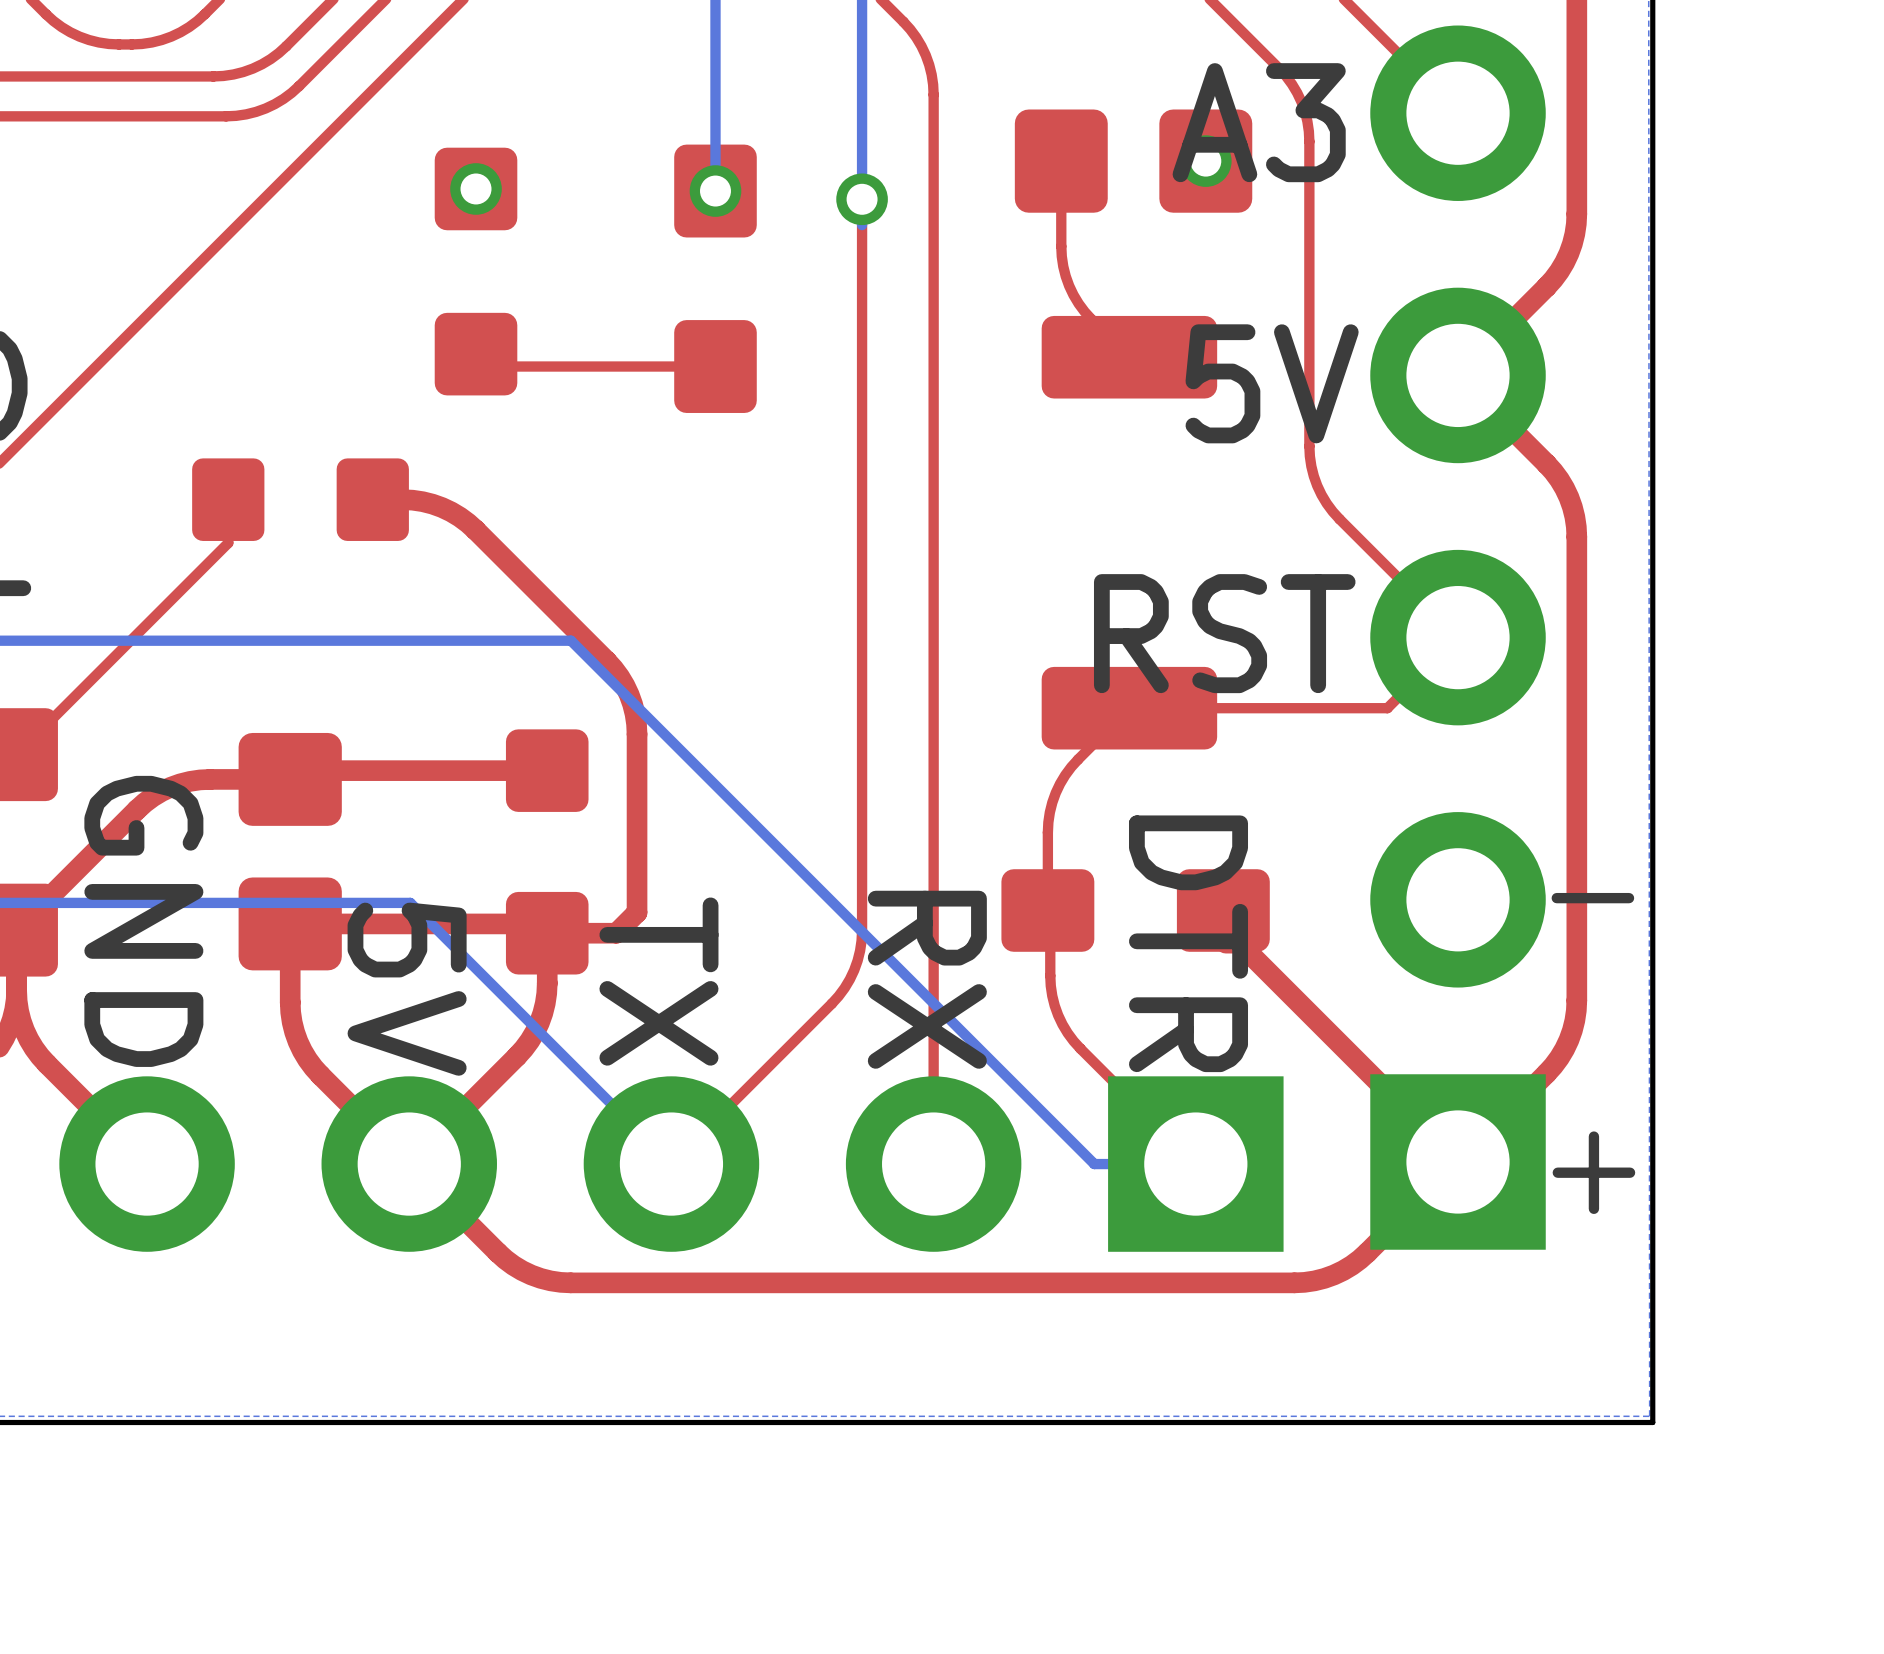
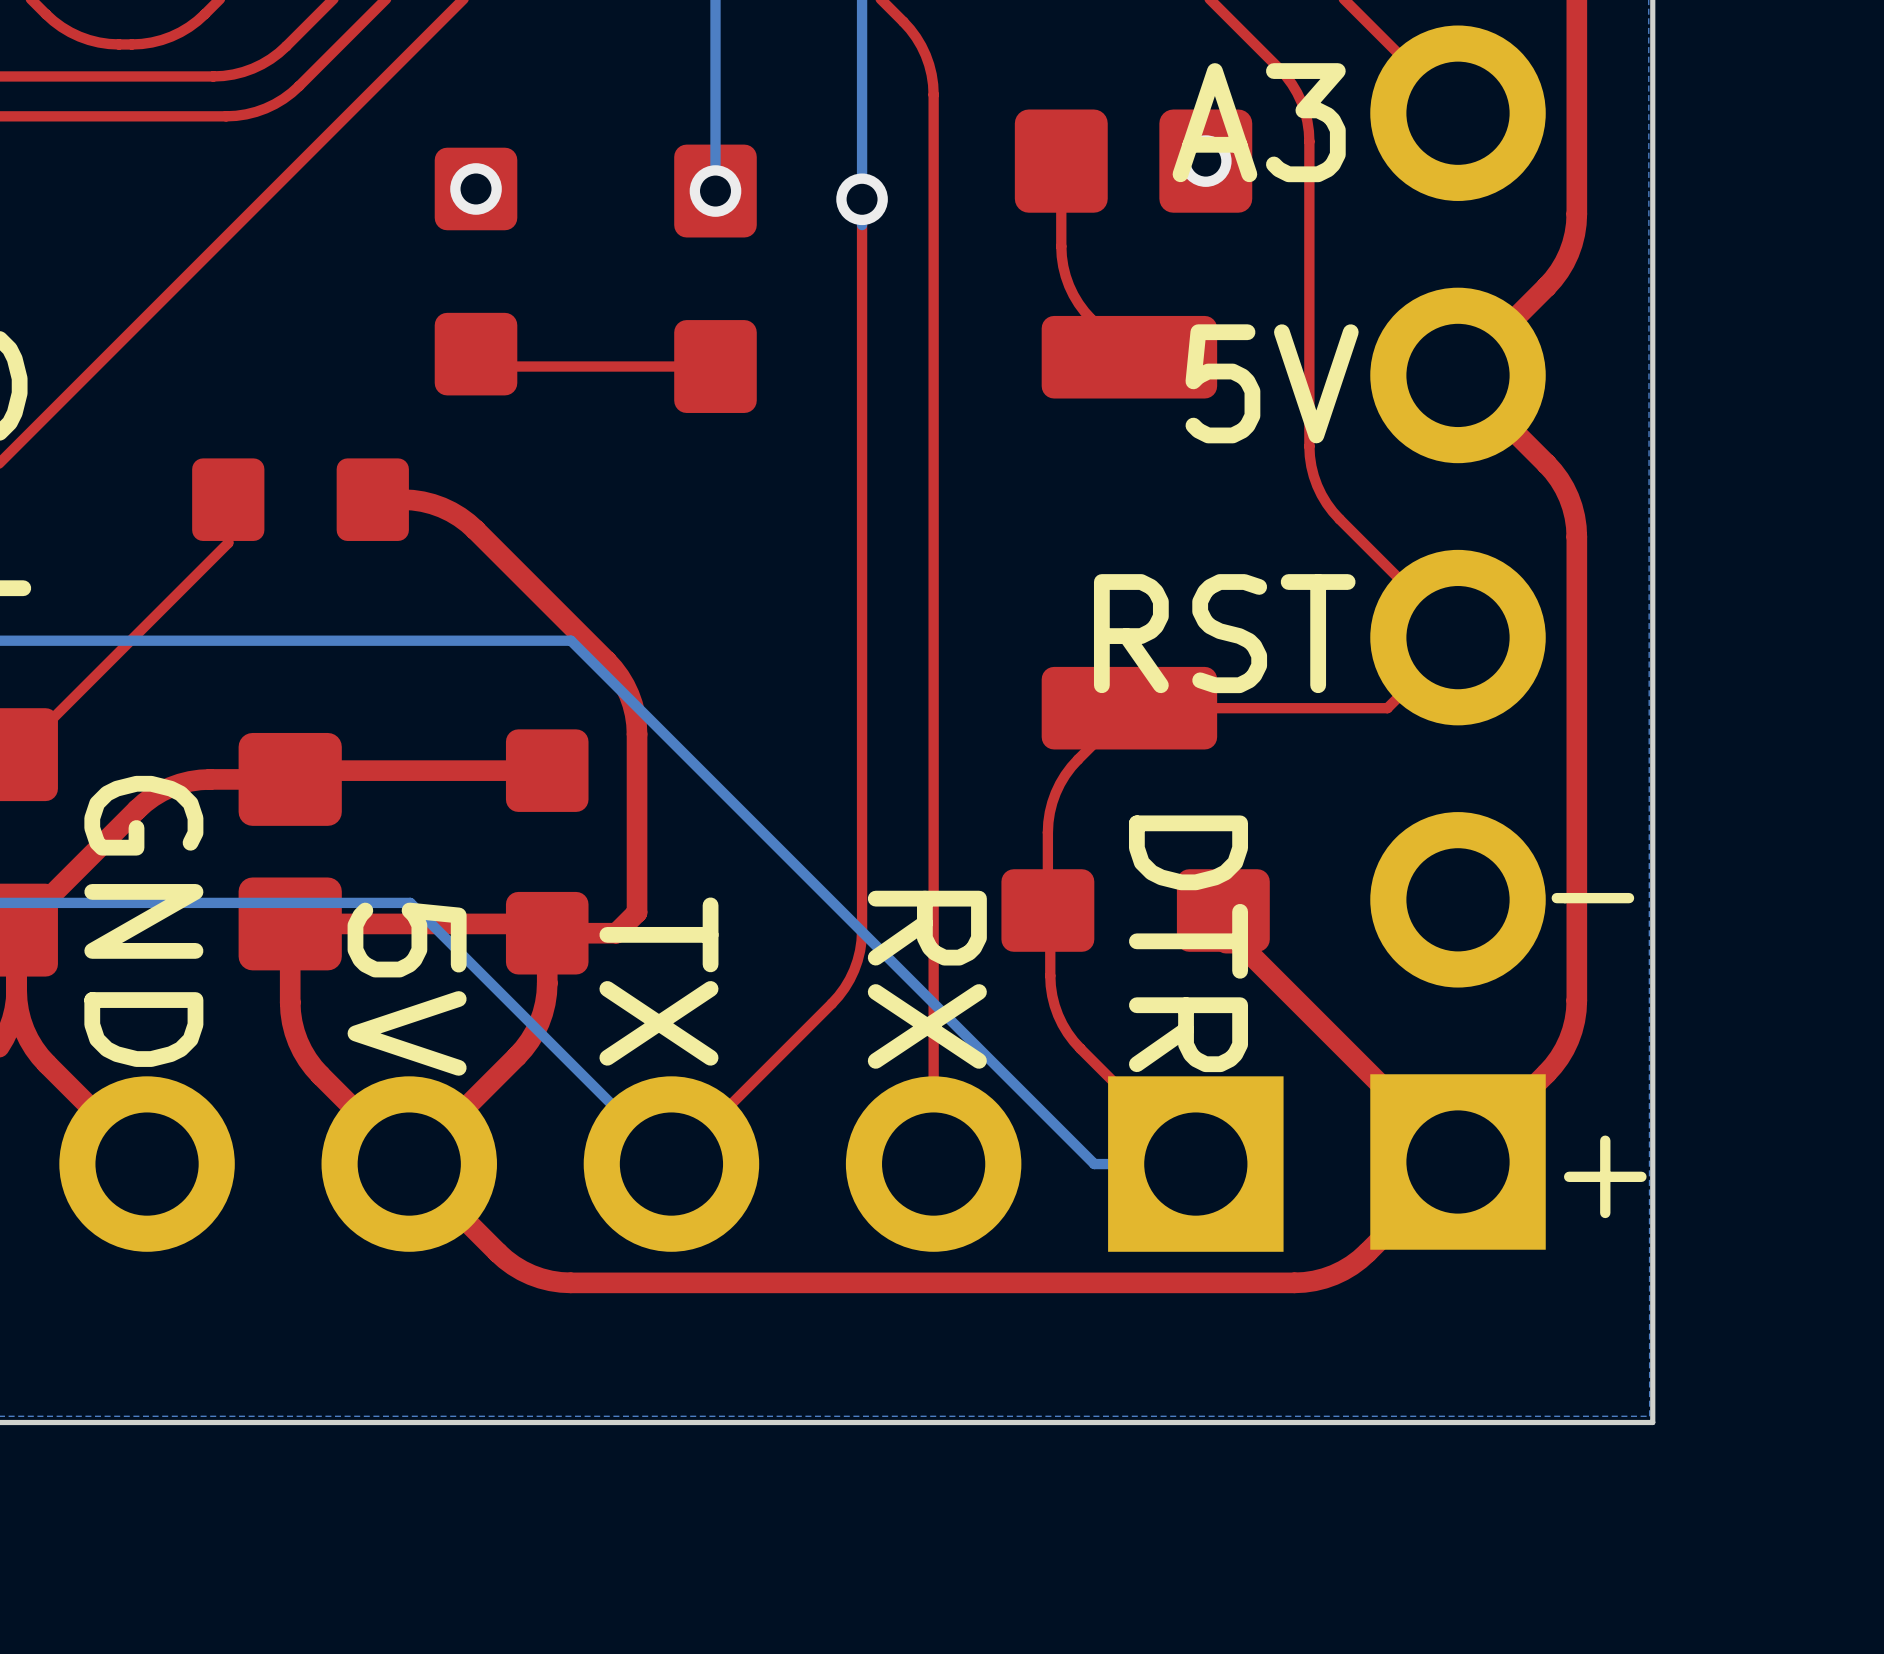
line: (1593, 1136) (1593, 1208) -> (1605, 1140) (1605, 1212)
line: (1630, 1172) (1557, 1172) -> (1641, 1176) (1569, 1176)

